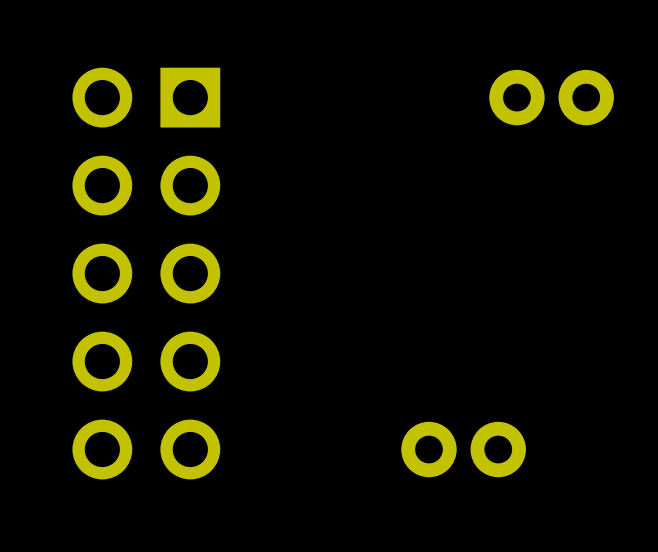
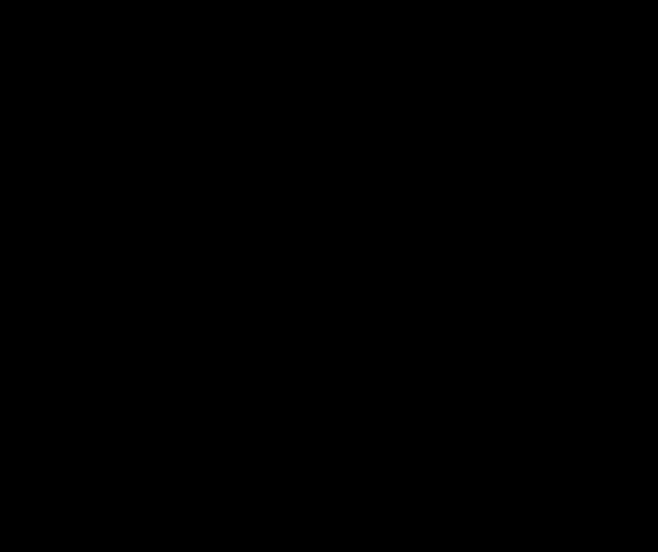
part: (551, 97) -> none
part: (146, 273) -> none
part: (463, 449) -> none

